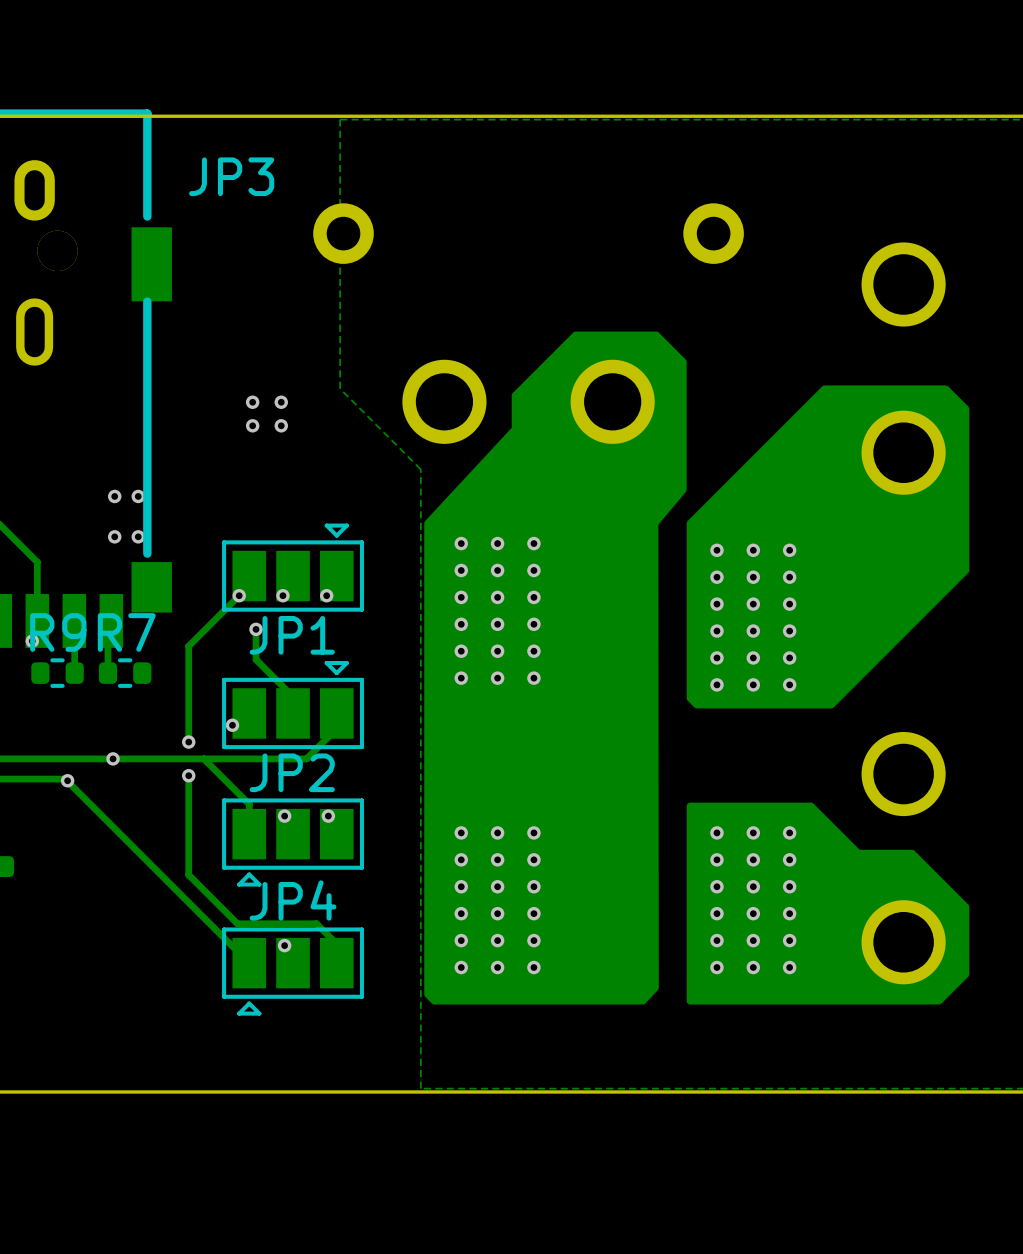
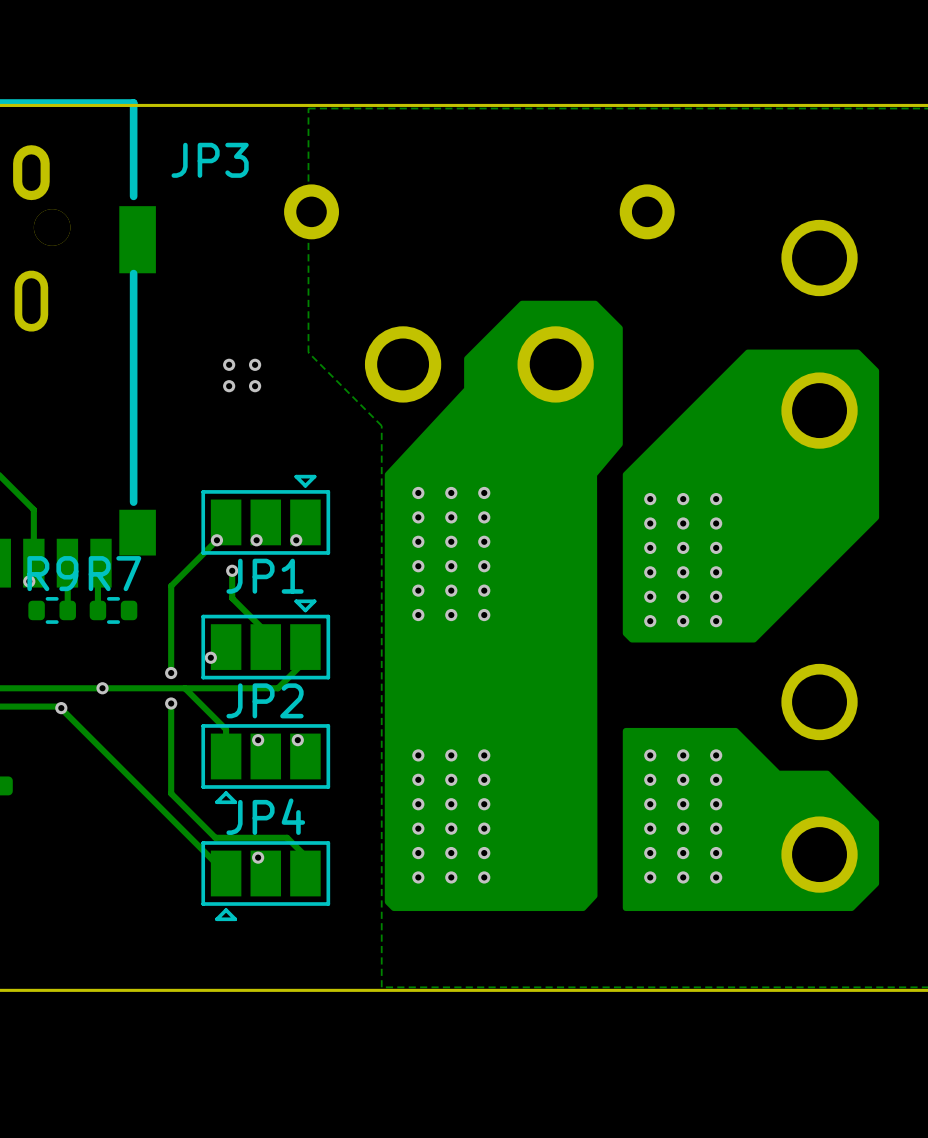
via: (114, 496) -> none
via: (138, 496) -> none
via: (114, 536) -> none
via: (138, 536) -> none

